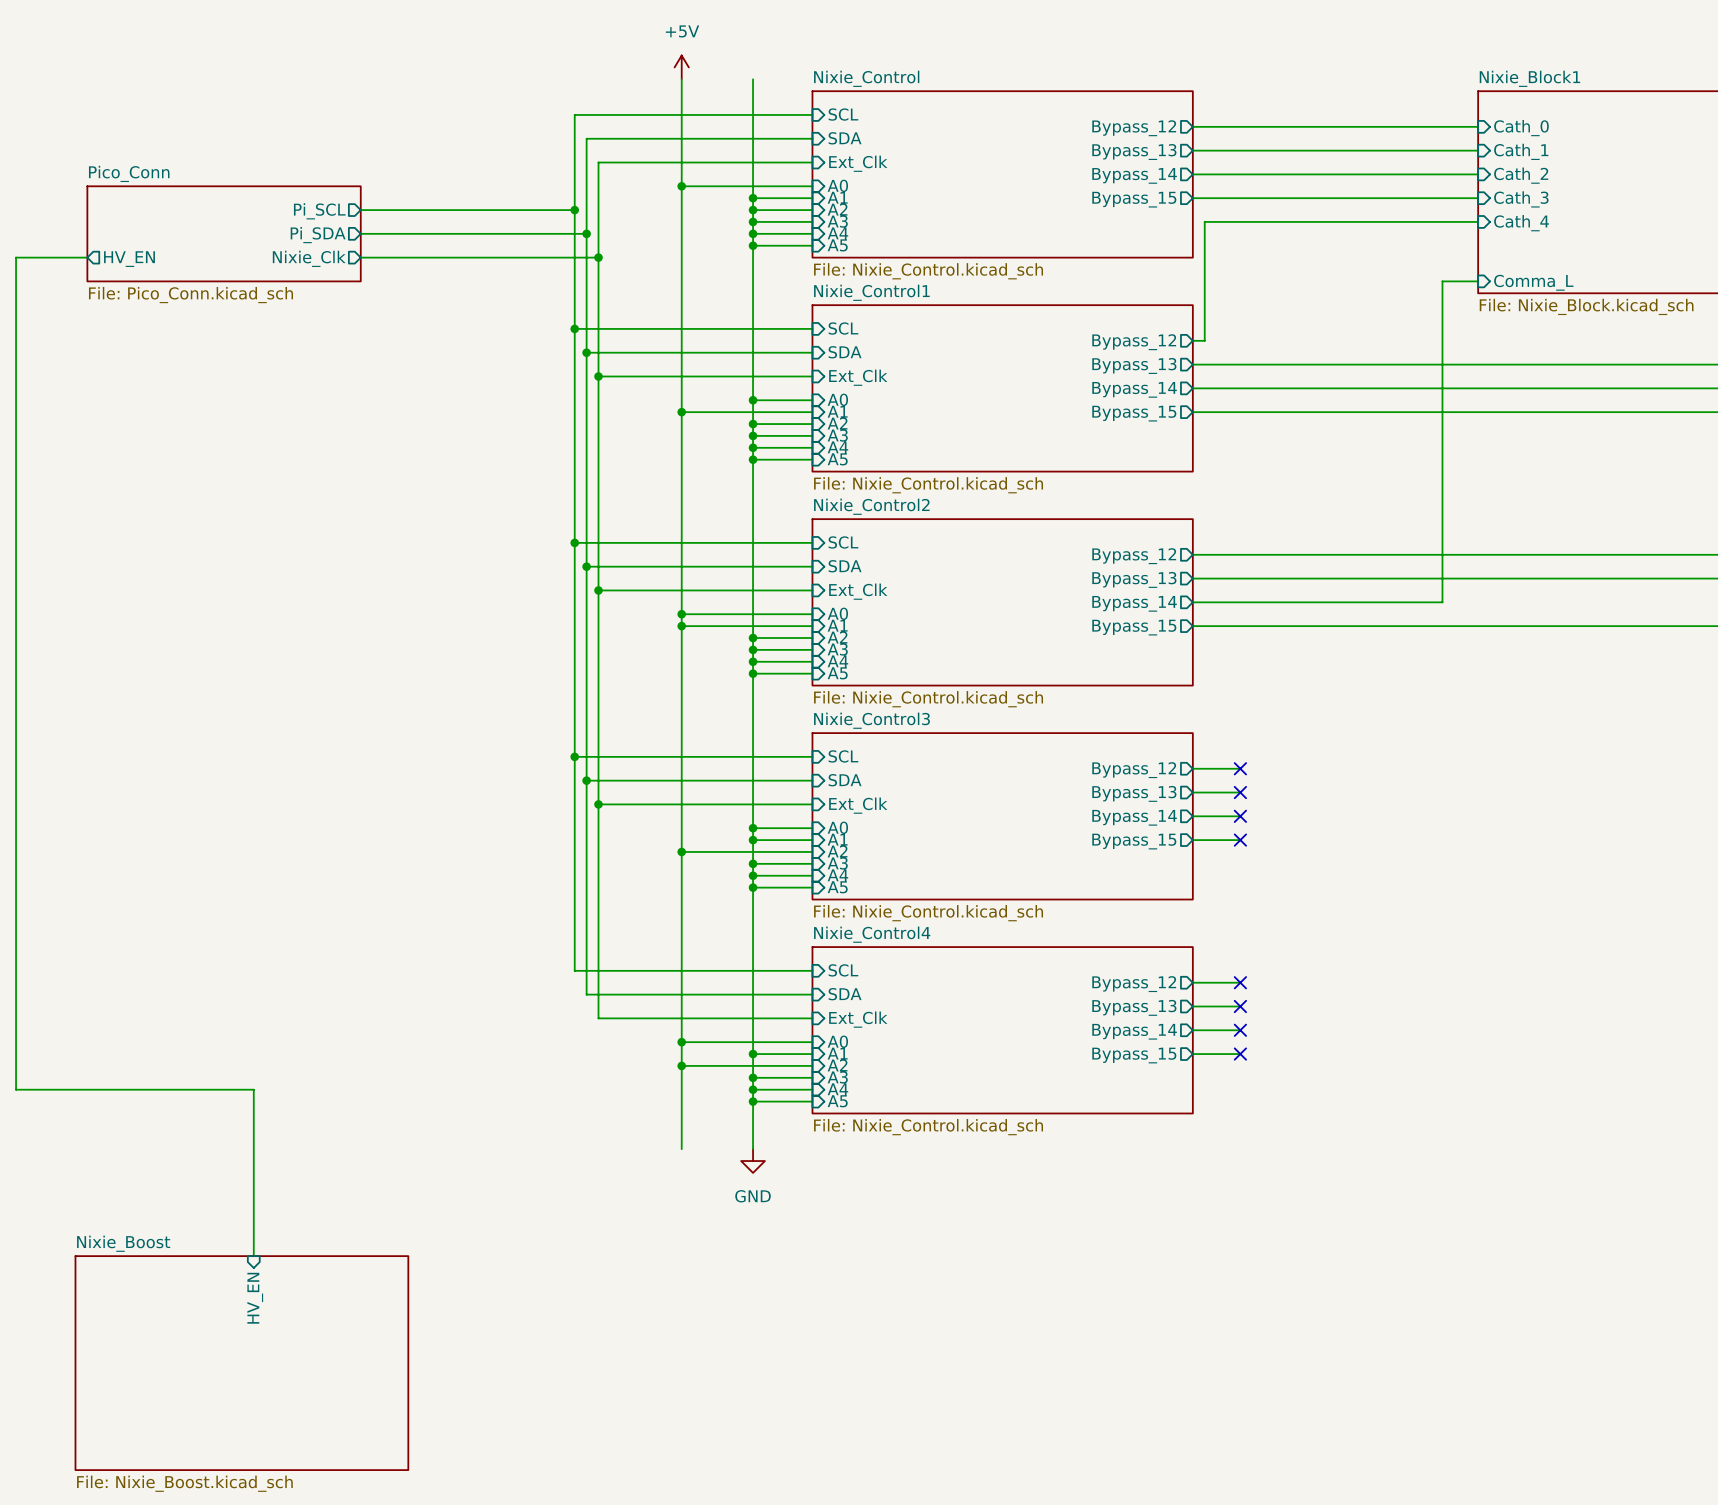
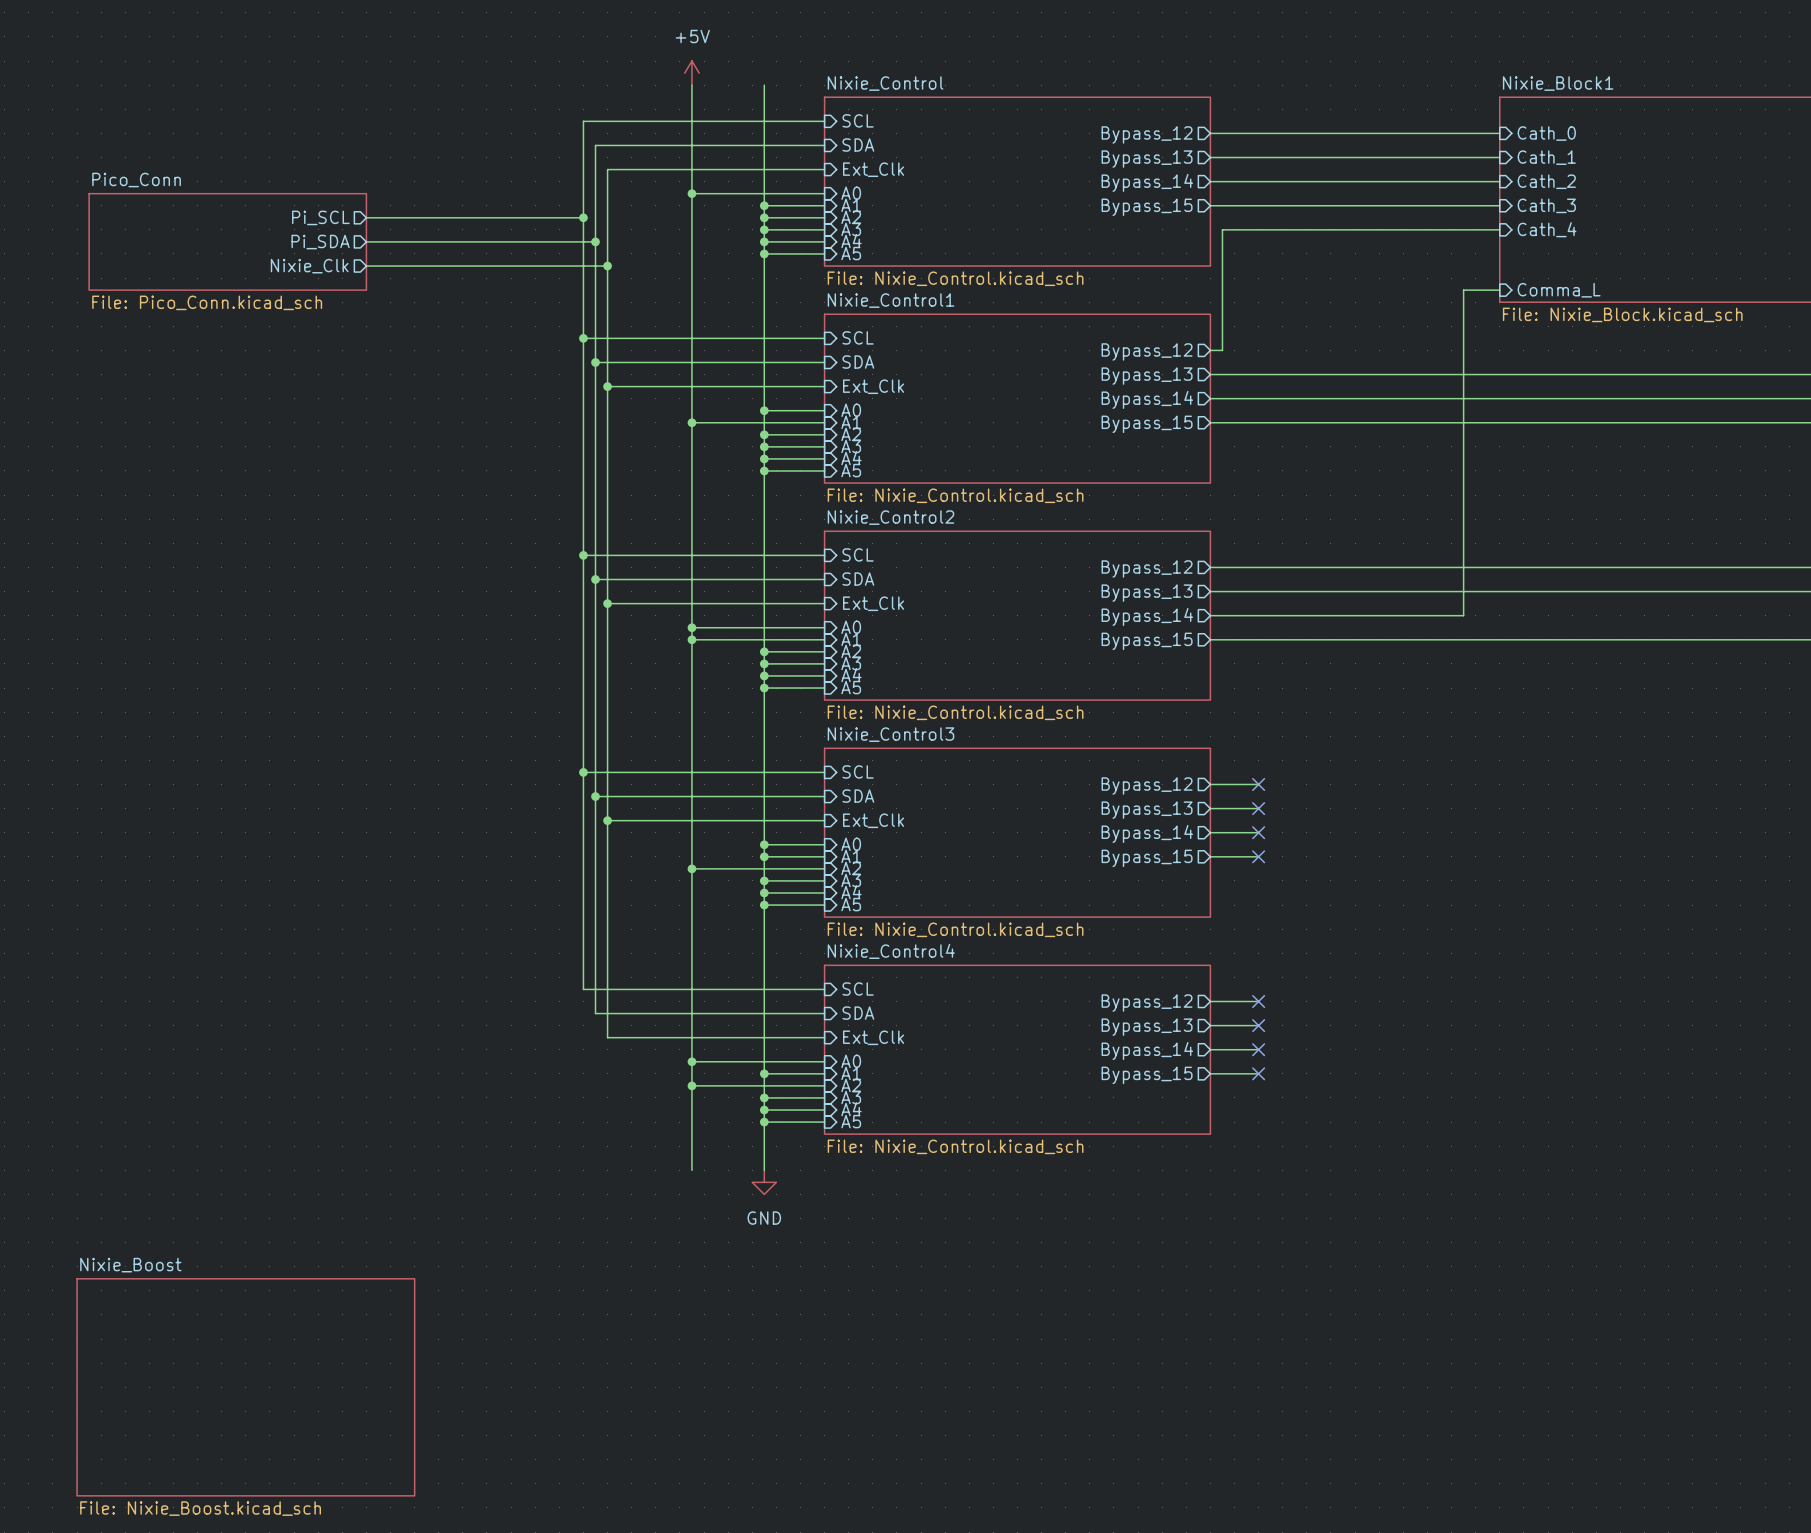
wire: (87, 257) (16, 257) (16, 1089) (253, 1089) (253, 1256) -> none
sheet pin: HV_EN (129, 259) -> none
sheet pin: HV_EN (255, 1298) -> none

